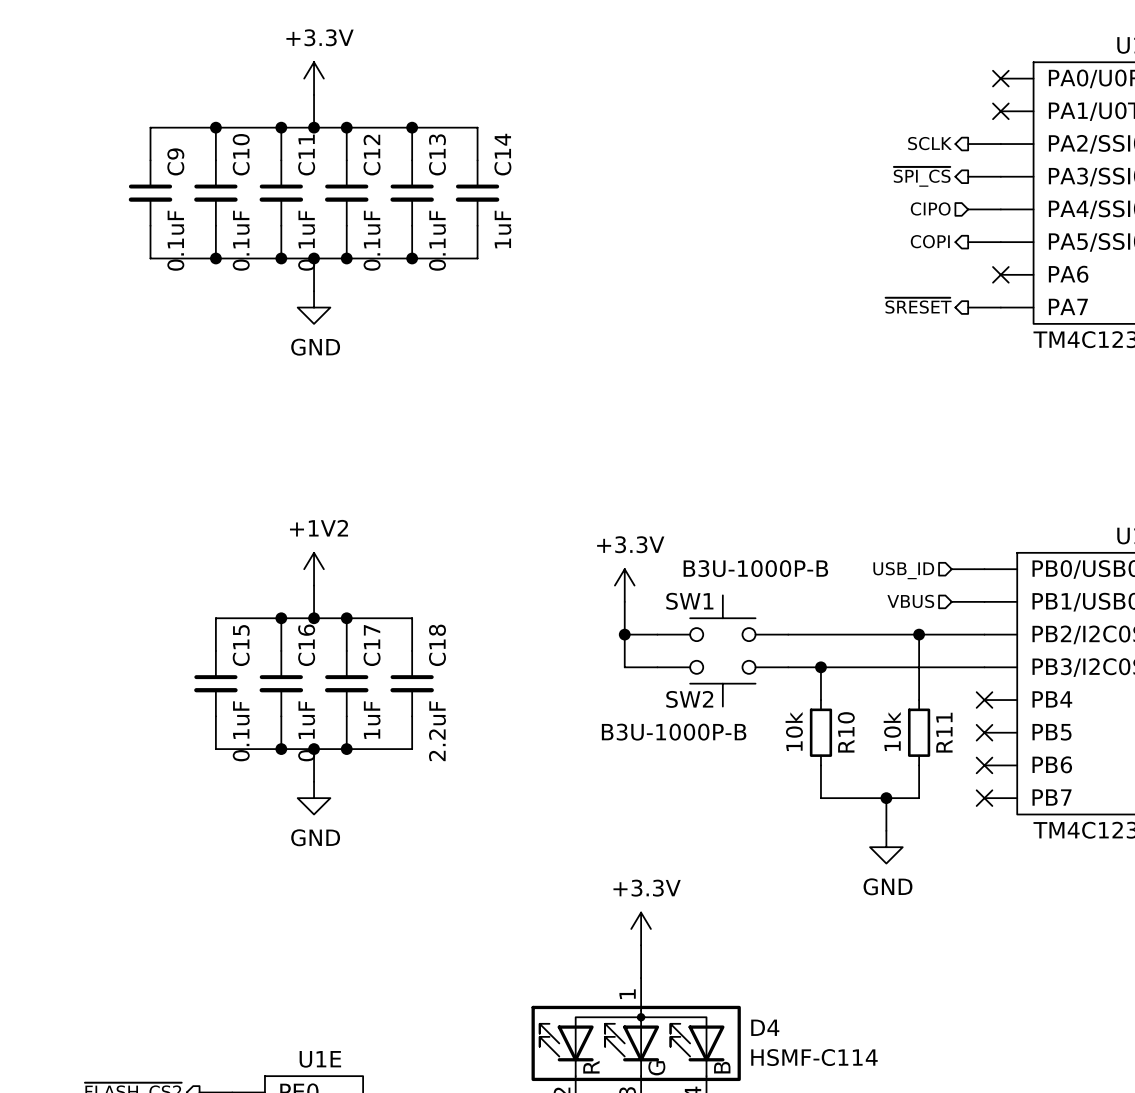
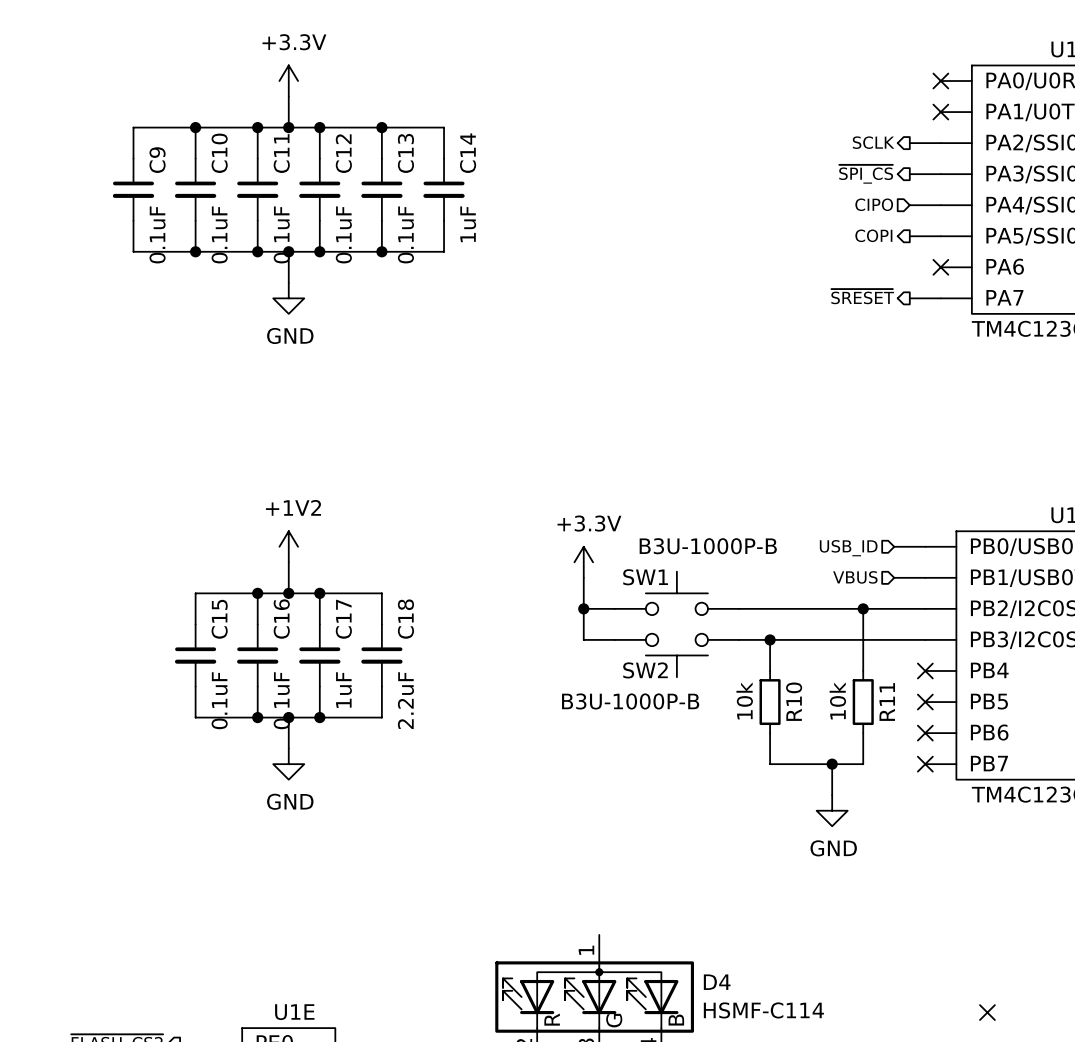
power symbol: +3.3V (641, 928) -> none
wire: (641, 945) (641, 978) -> none
no-connect mark: none -> (987, 1012)

